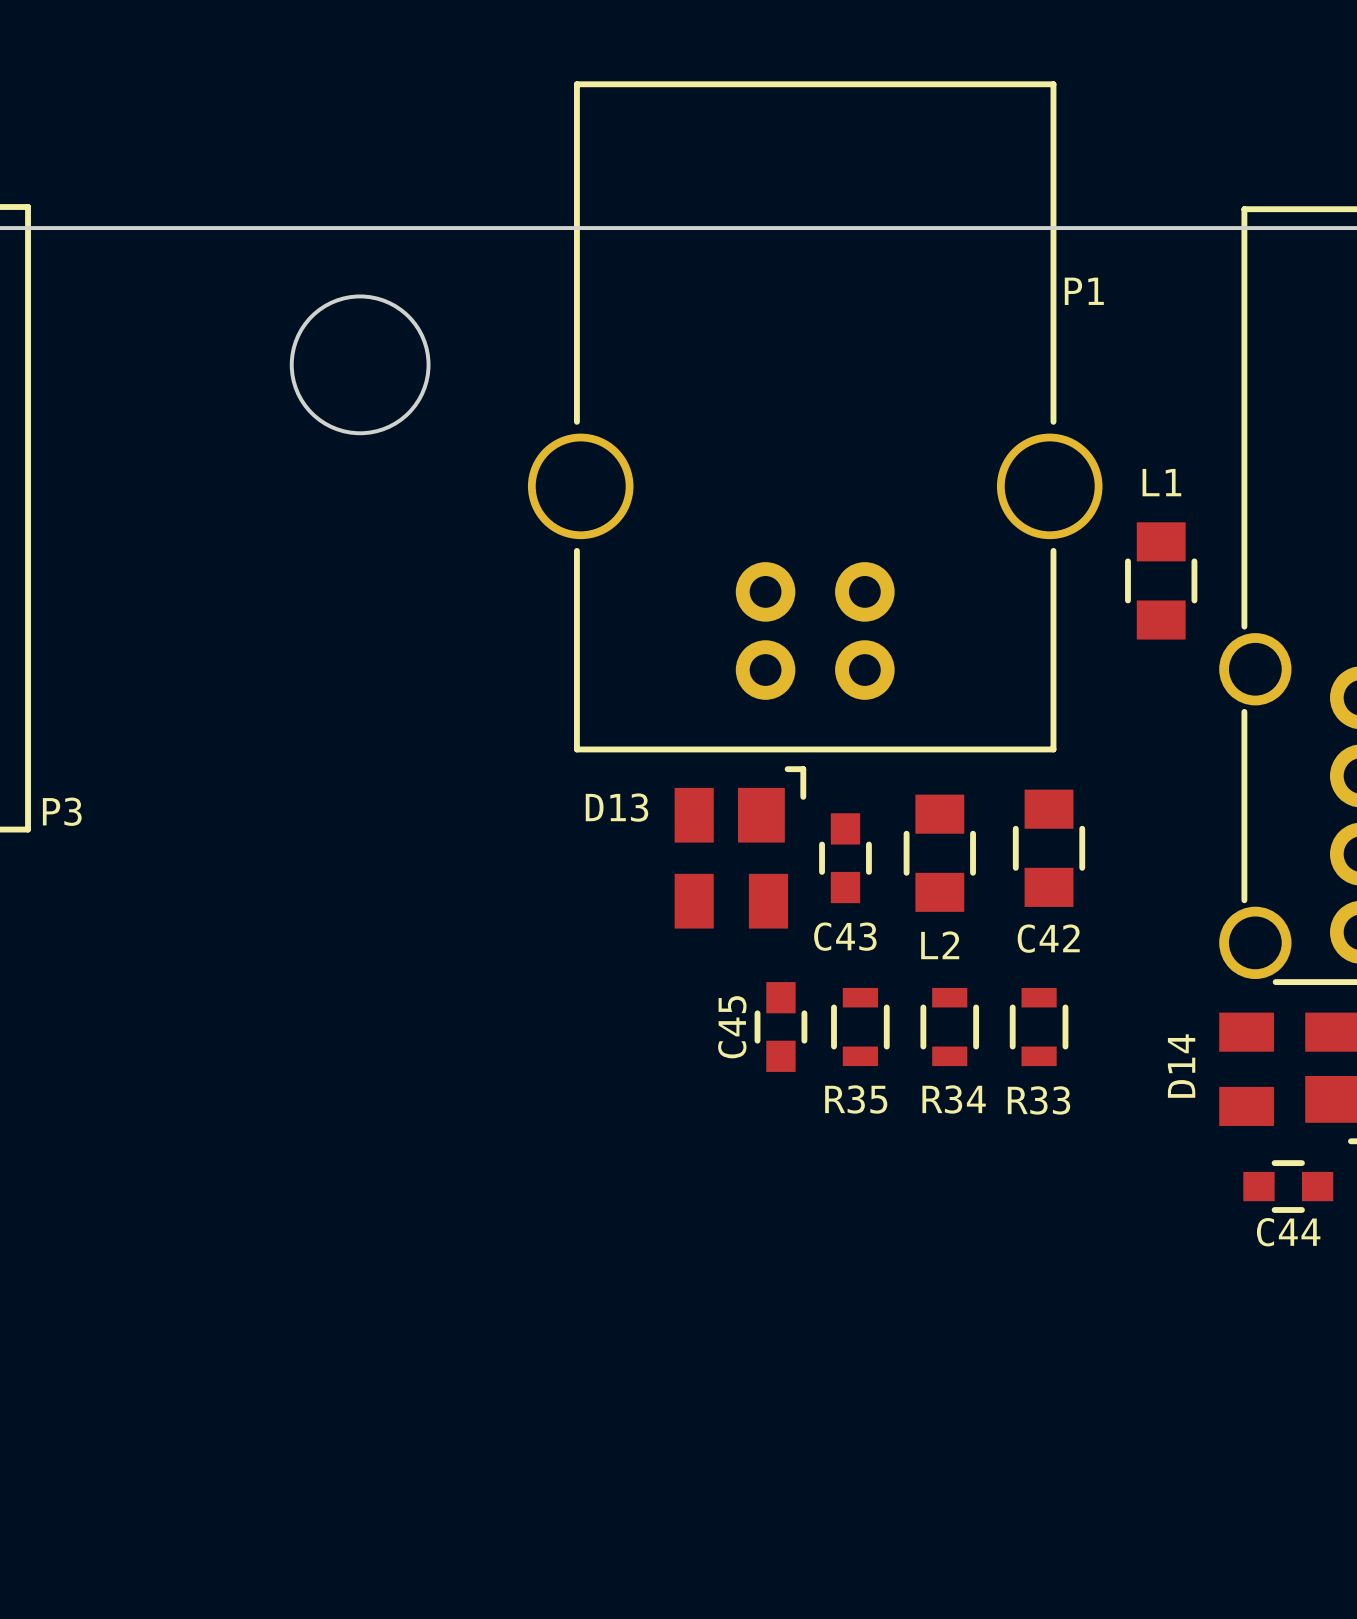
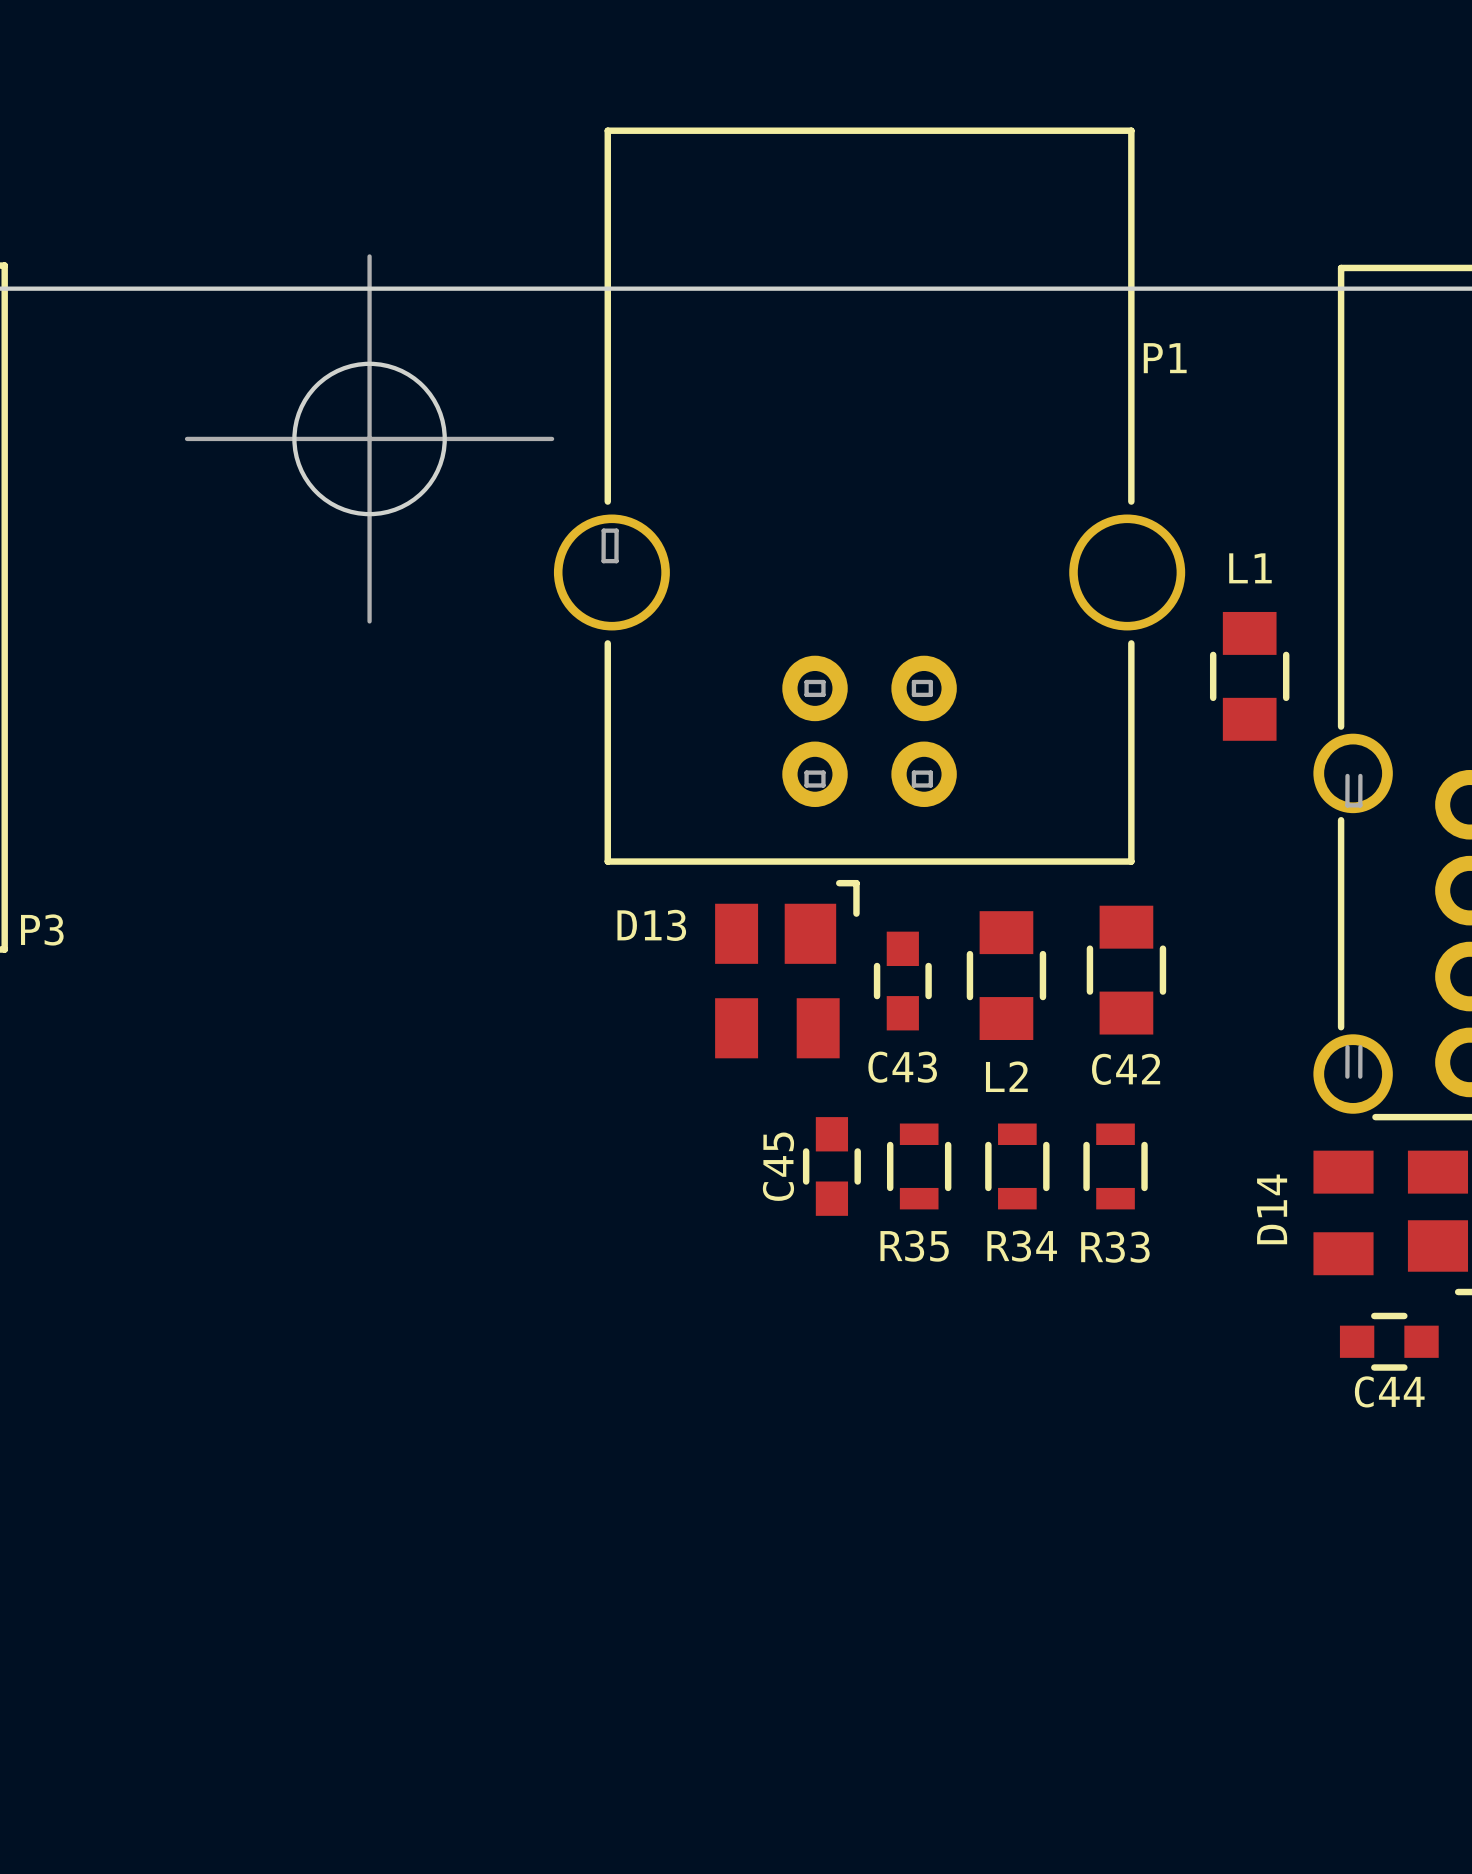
line: none -> (369, 256) (369, 621)
line: none -> (187, 438) (552, 438)
line: none -> (603, 530) (603, 561) (616, 561) (616, 530) (603, 530)
line: none -> (806, 681) (823, 681) (823, 694) (806, 694) (806, 681)
line: none -> (913, 681) (913, 694) (930, 694) (930, 681) (913, 681)
line: none -> (806, 772) (823, 772) (823, 785) (806, 785) (806, 772)
line: none -> (913, 772) (930, 772) (930, 785) (913, 785) (913, 772)
line: none -> (1347, 775) (1347, 805)
line: none -> (1360, 775) (1360, 805)
line: none -> (1347, 805) (1360, 805)
line: none -> (1347, 1047) (1347, 1076)
line: none -> (1360, 1047) (1360, 1076)

